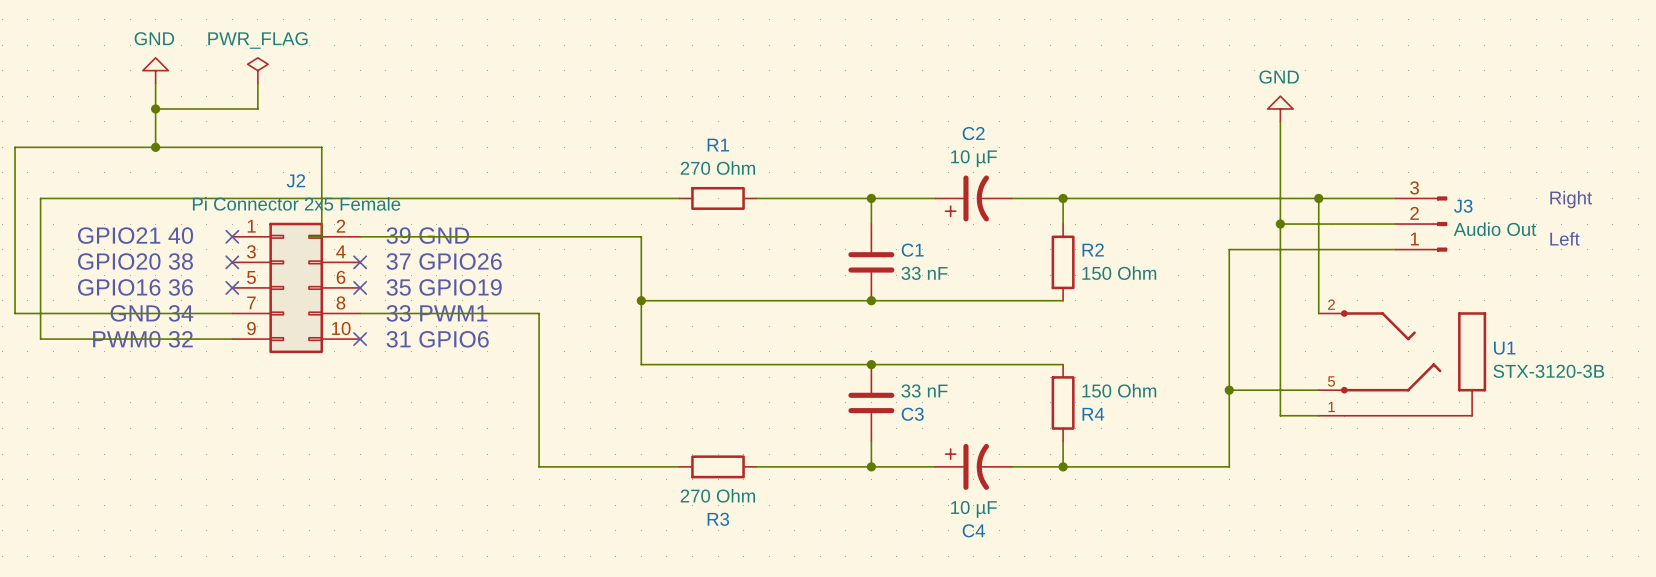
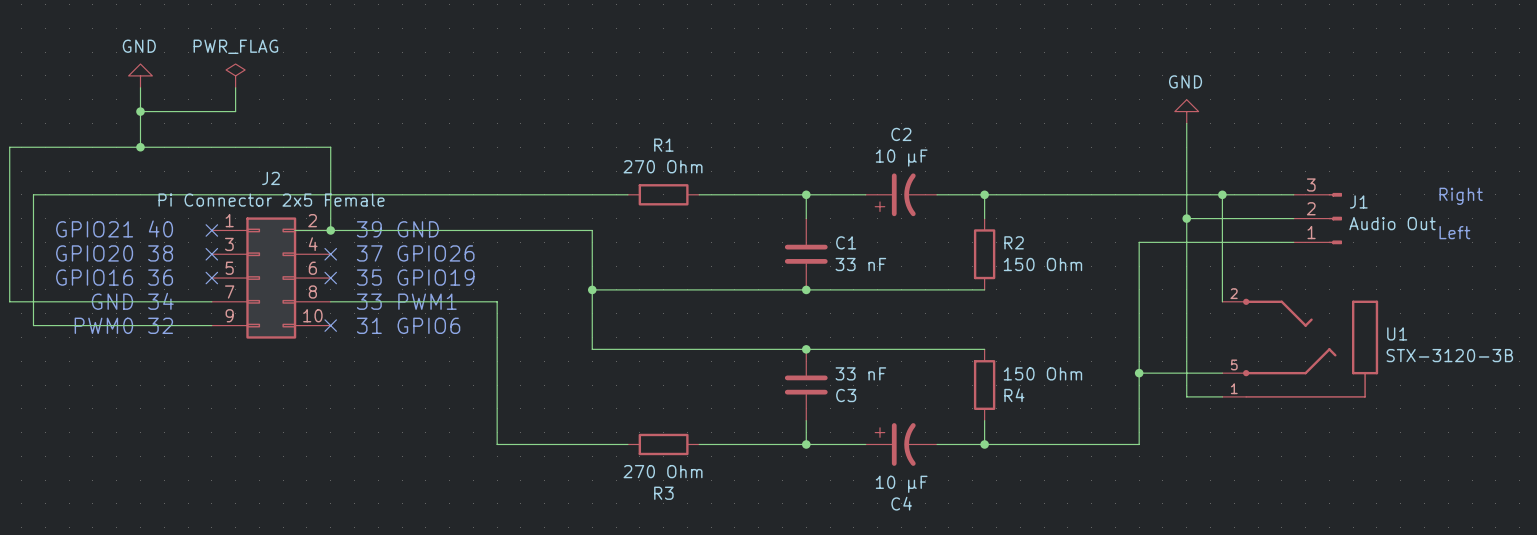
wire: (321, 147) (321, 236) (309, 236) -> (295, 147) (330, 147) (330, 230) (295, 230)
J3 name: J3 (1463, 206) -> J1 (1358, 201)
junction: none -> (330, 230)

